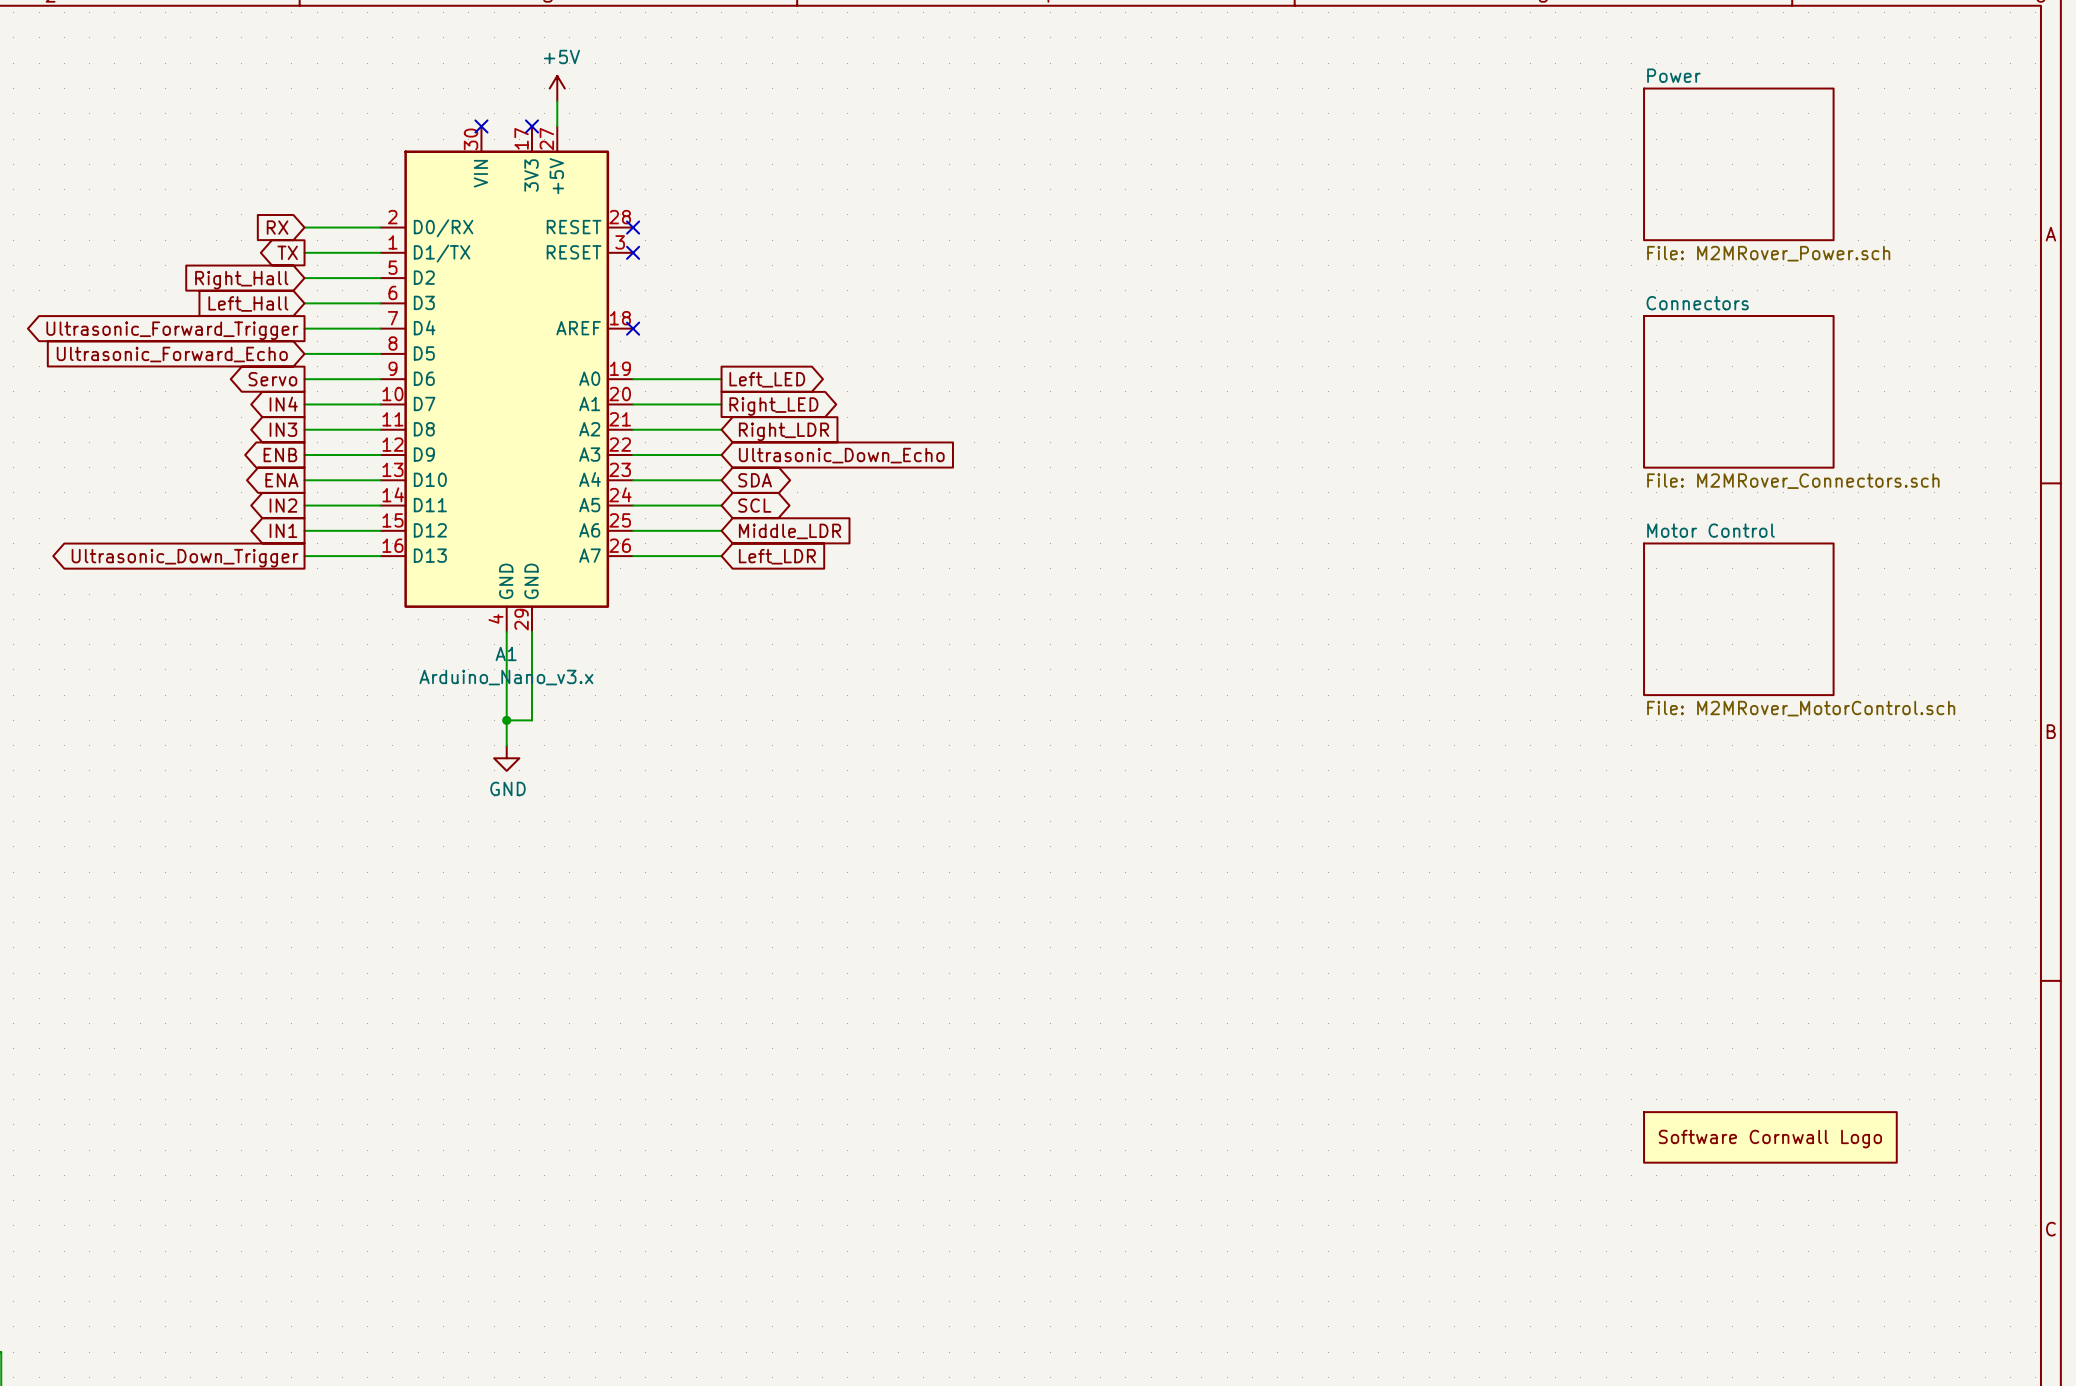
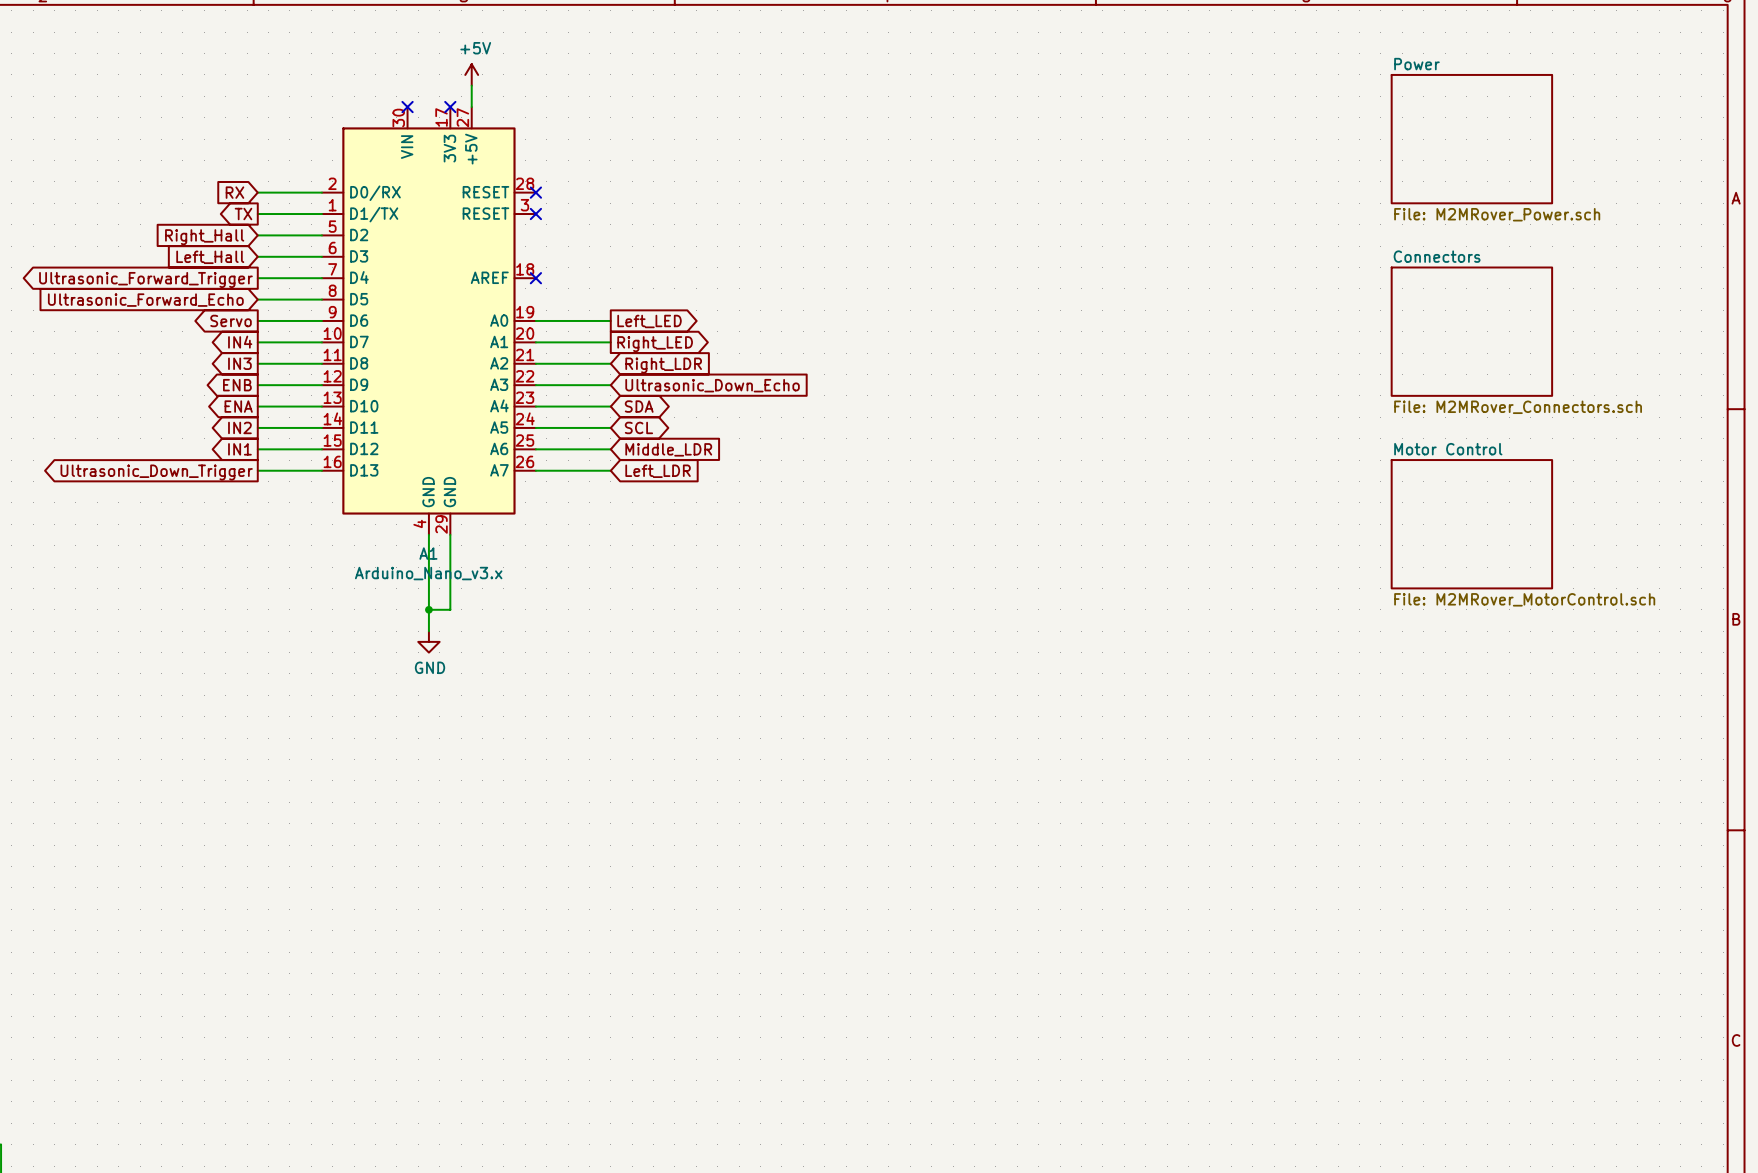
part: (1770, 1137) -> none

